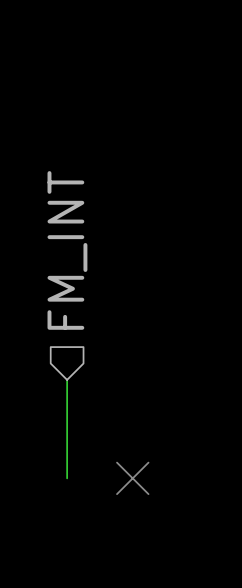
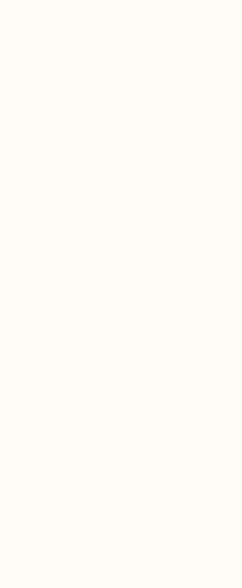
hierarchical label: FM_INT (67, 250) -> none
wire: (67, 379) (67, 478) -> none
no-connect mark: (132, 478) -> none

